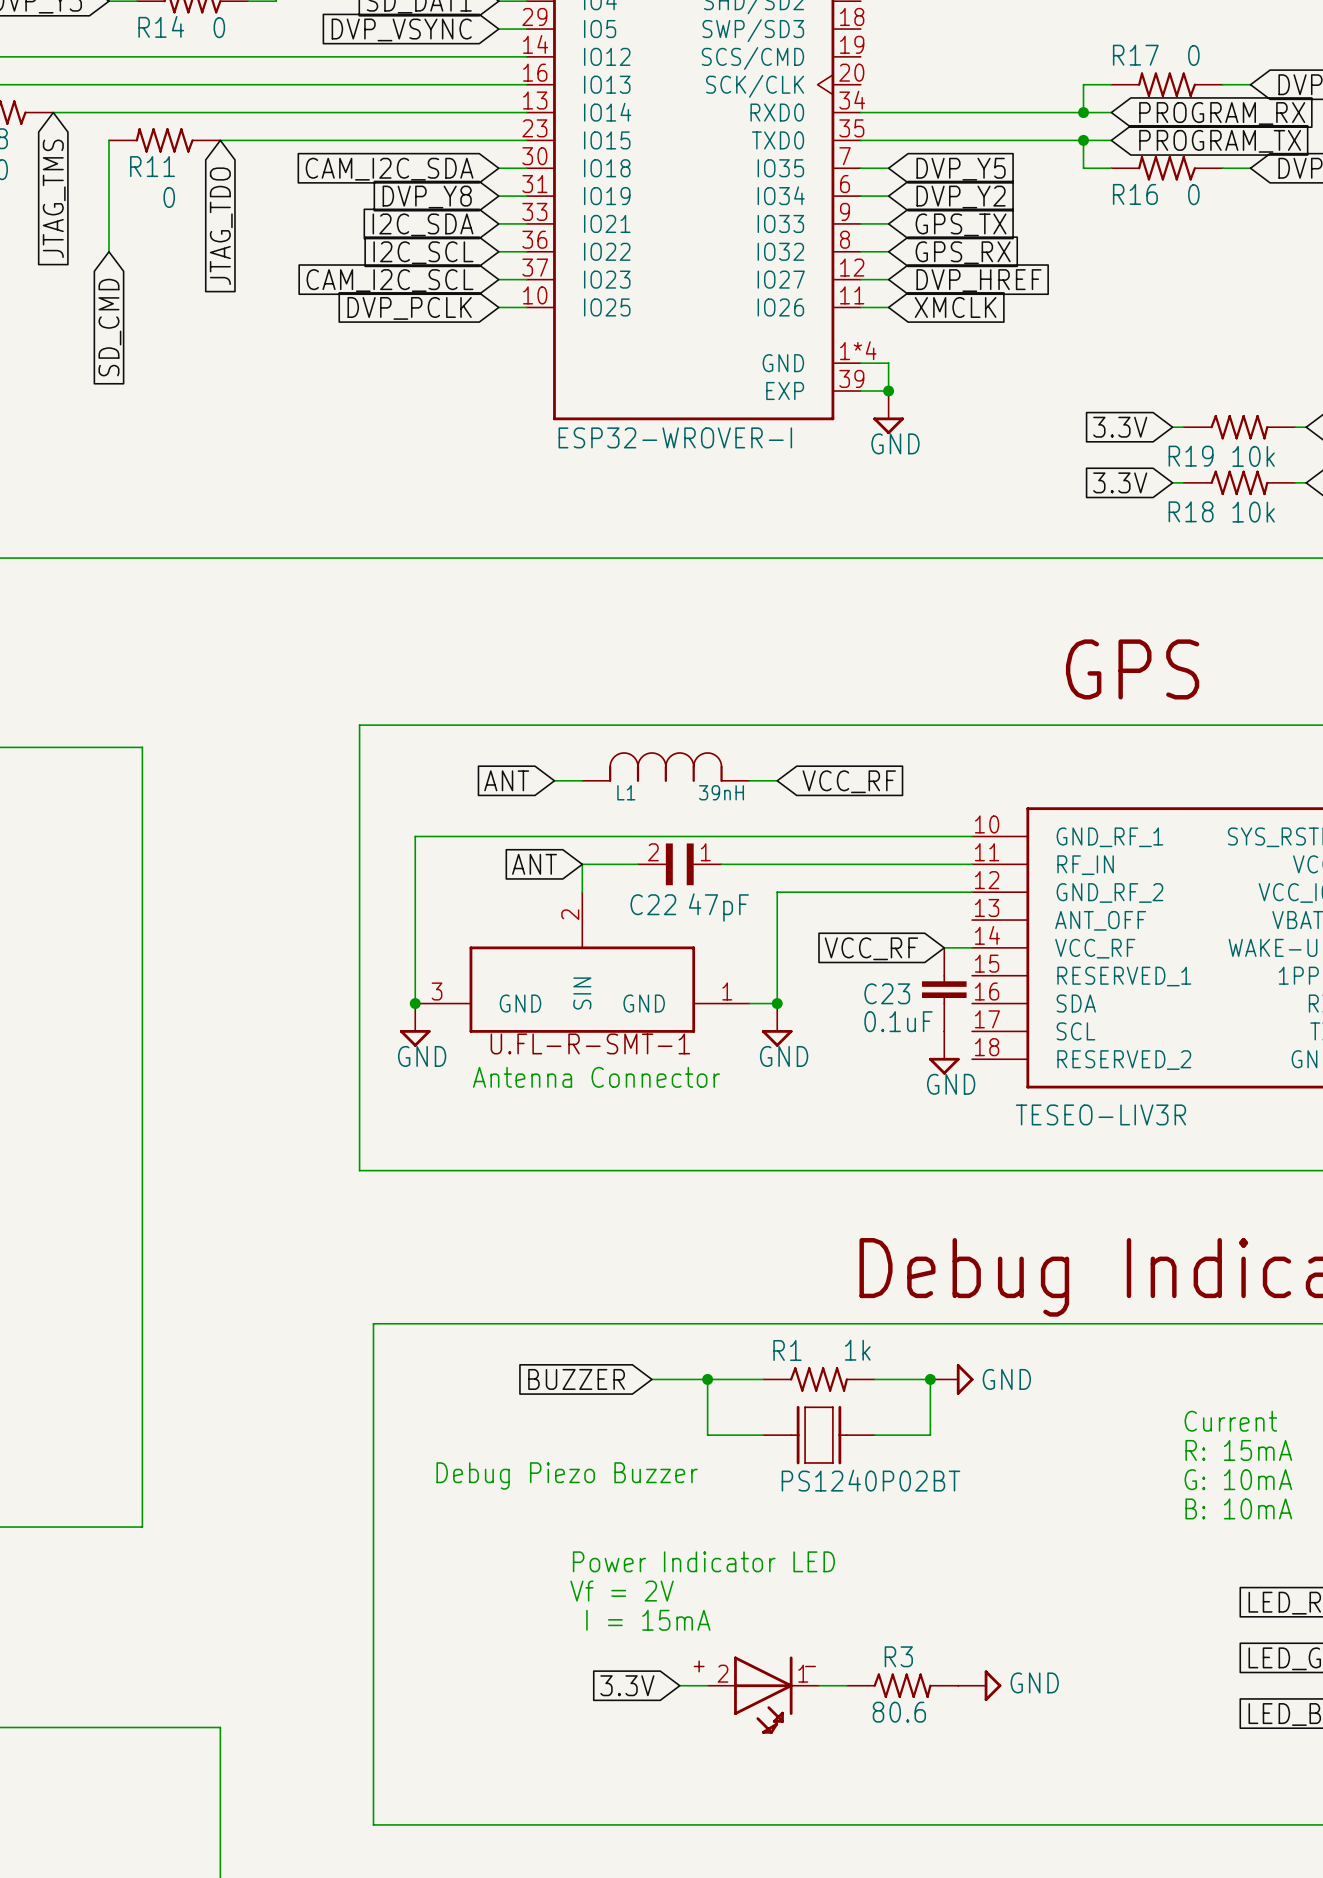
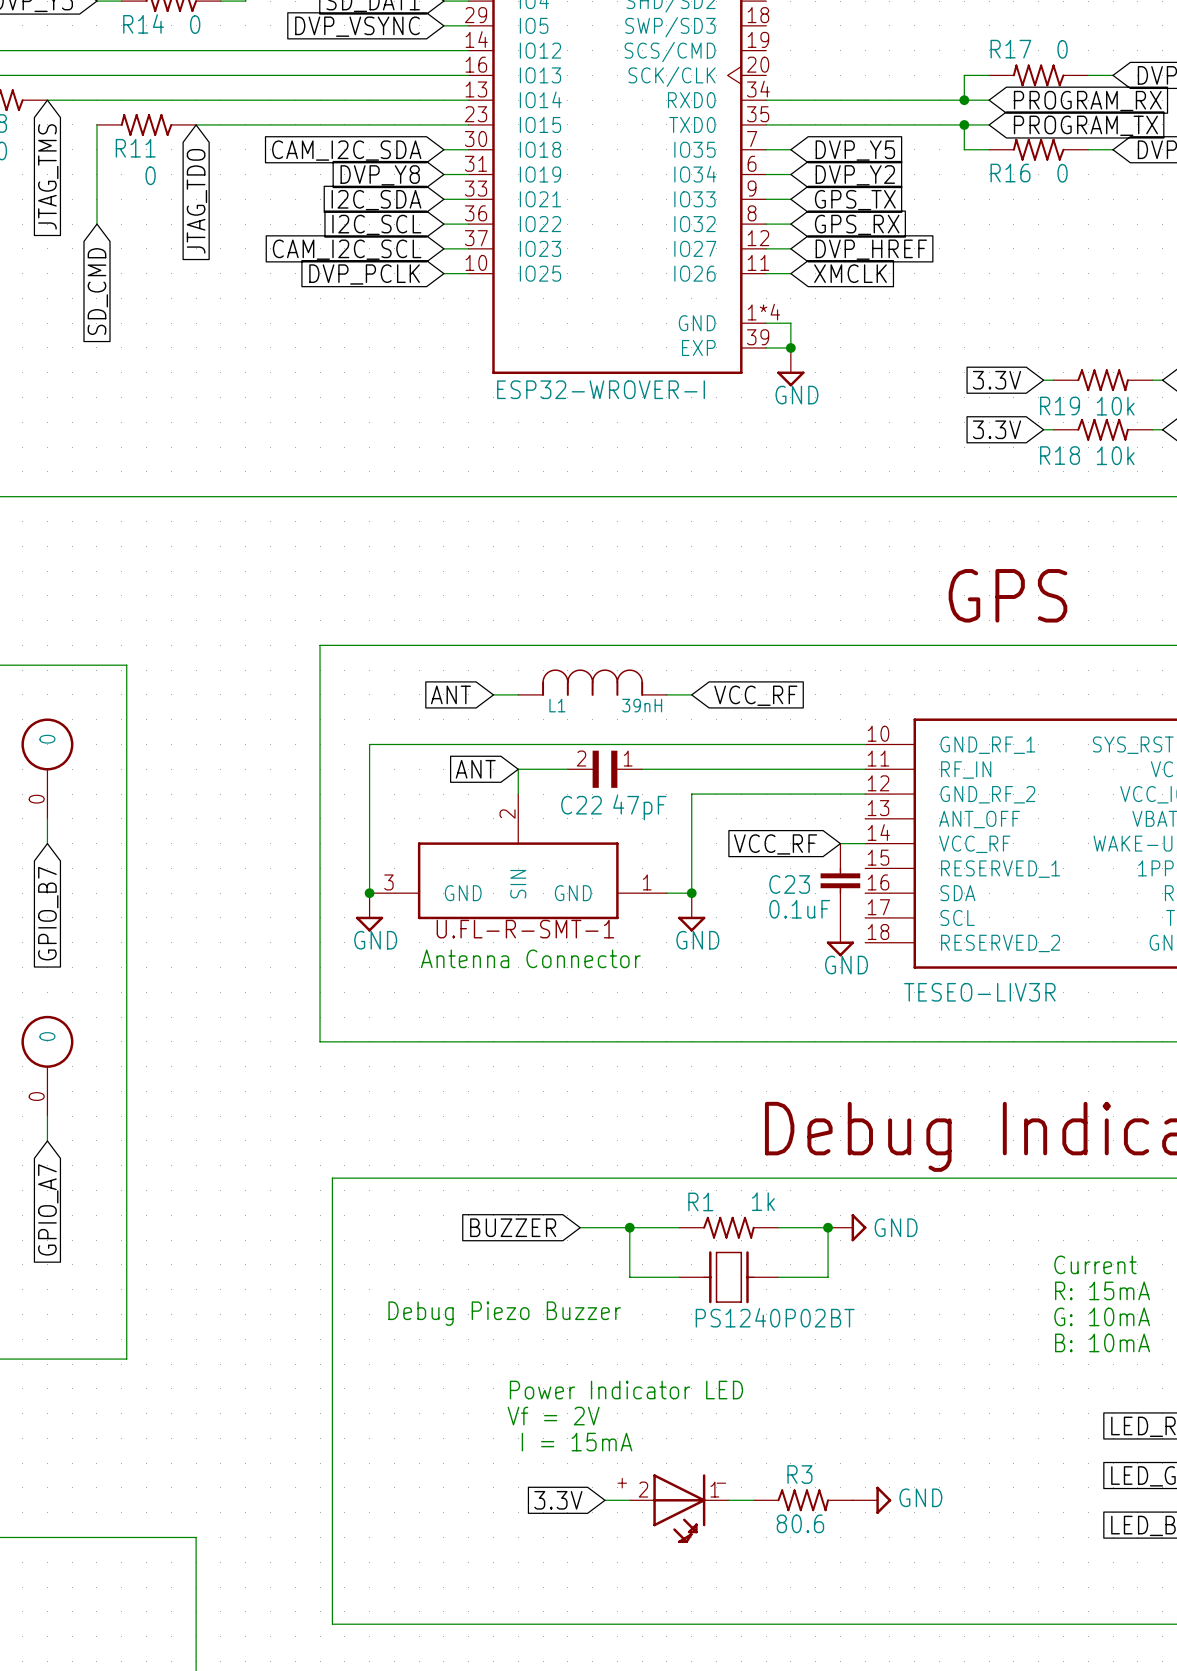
part: none -> (47, 768)
wire: none -> (47, 818) (47, 843)
global label: none -> GPIO_B7 (48, 913)
part: none -> (47, 1066)
wire: none -> (47, 1116) (47, 1140)
global label: none -> GPIO_A7 (48, 1209)

